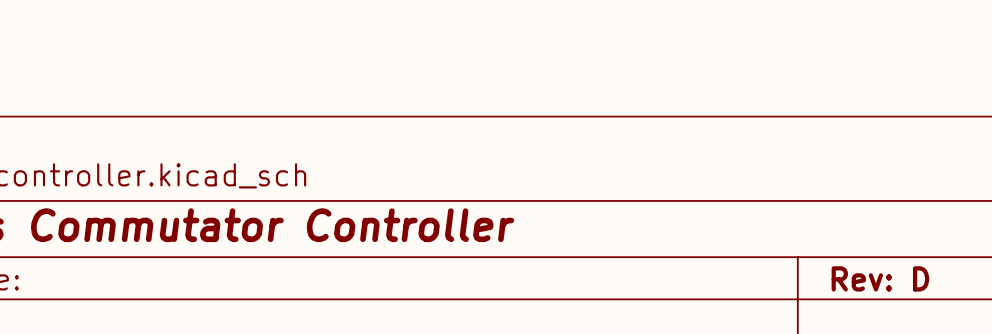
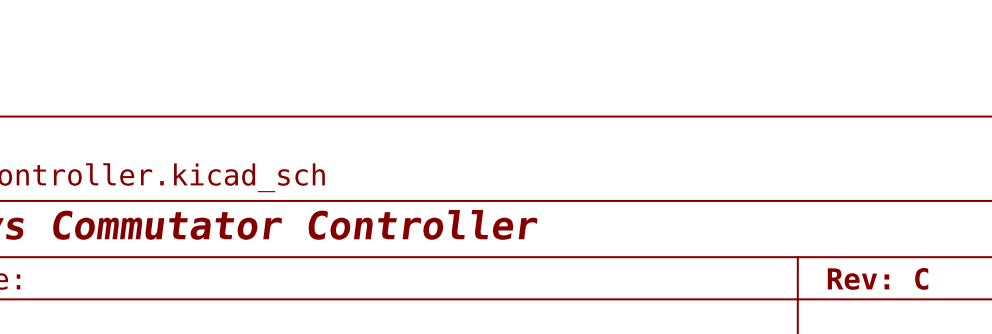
title block: Rev: D (880, 278) -> Rev: C (878, 278)

